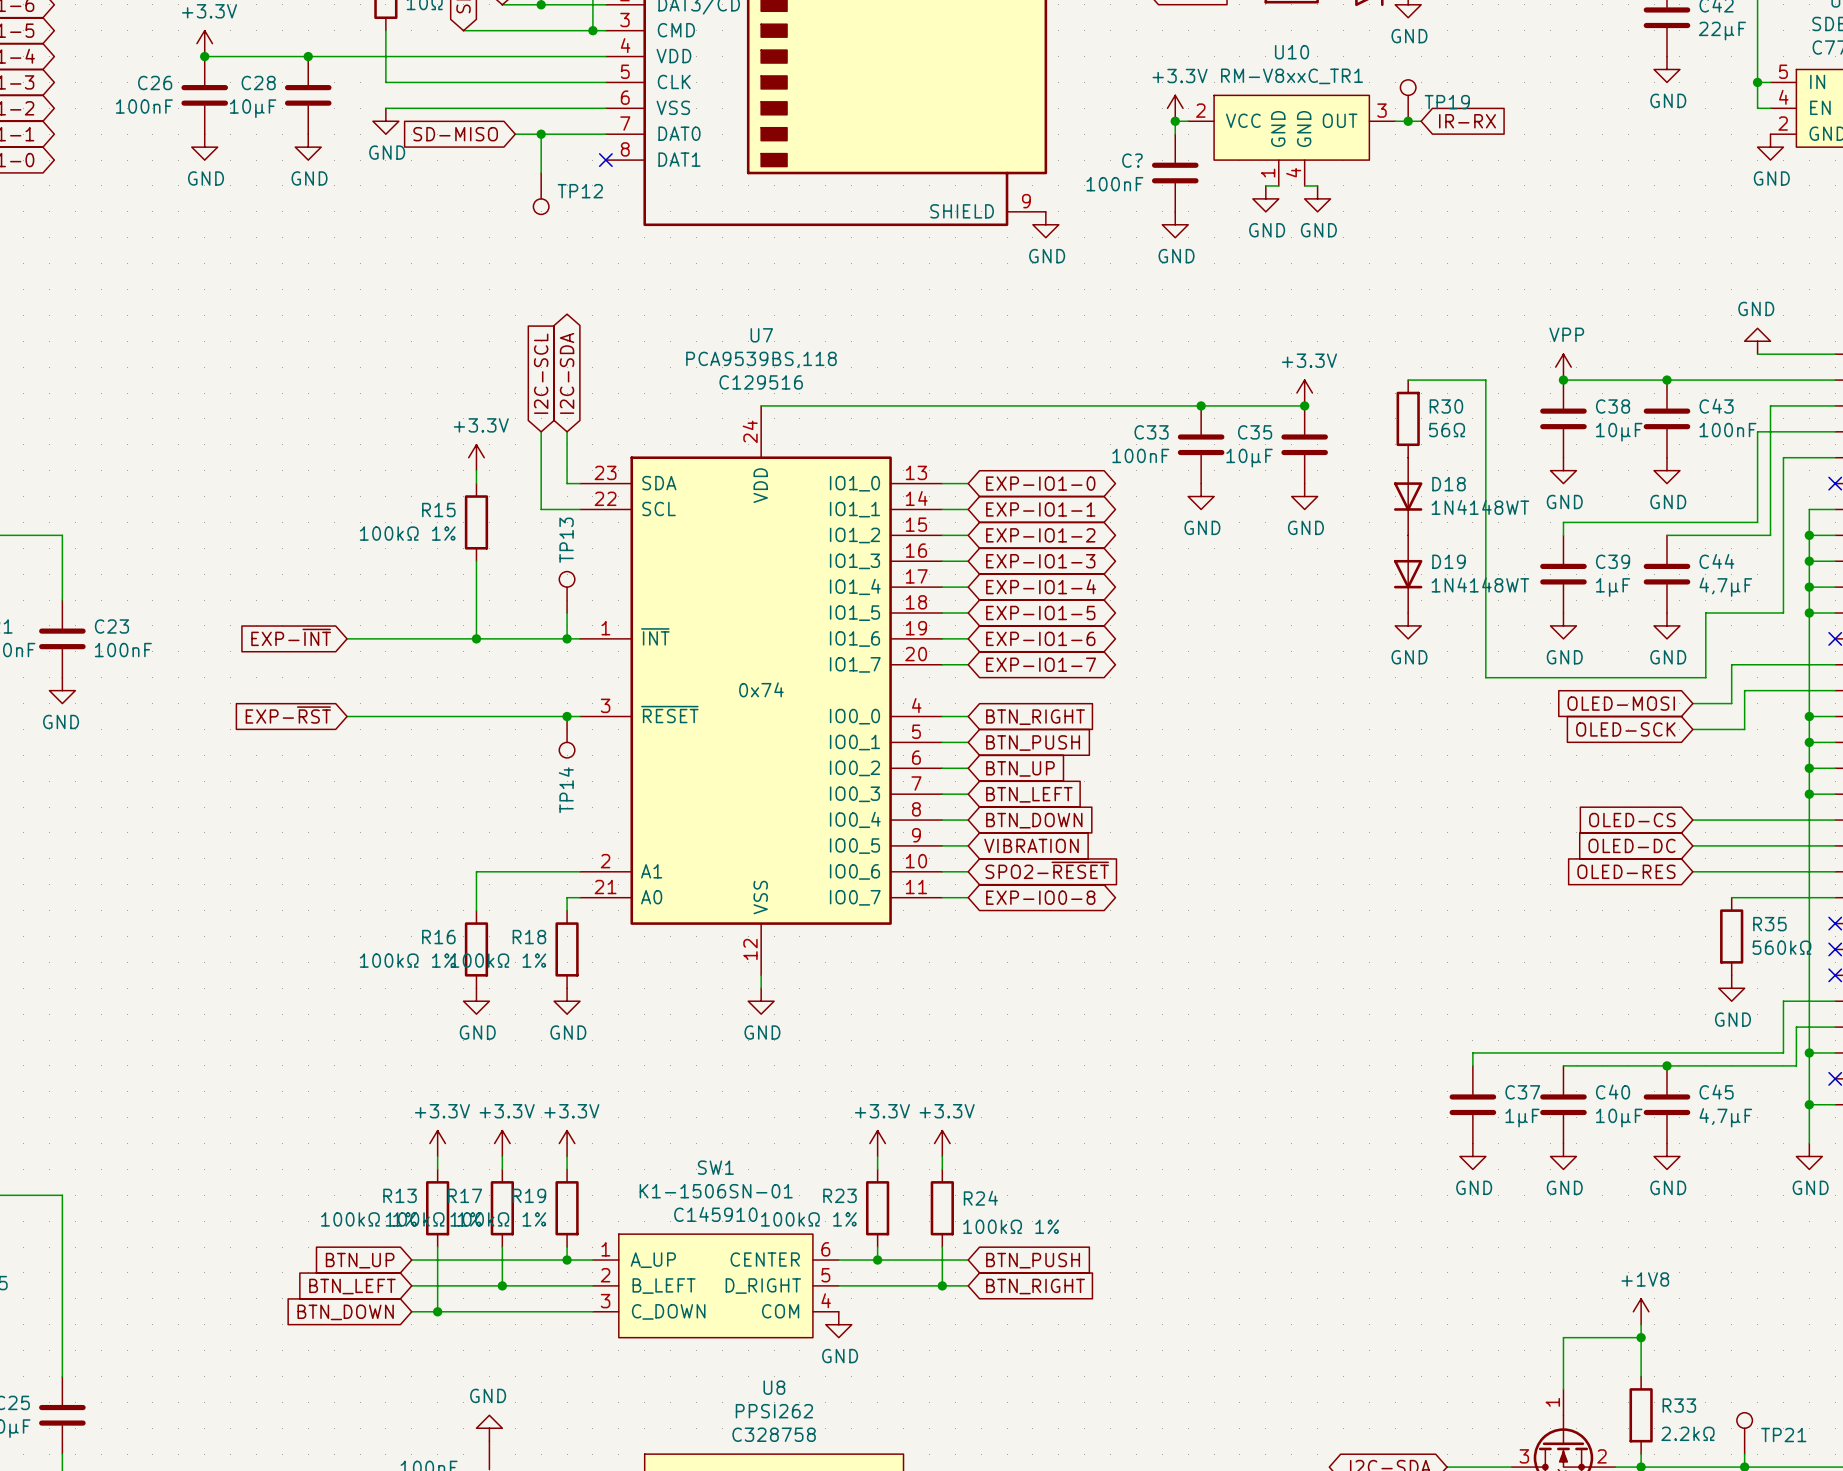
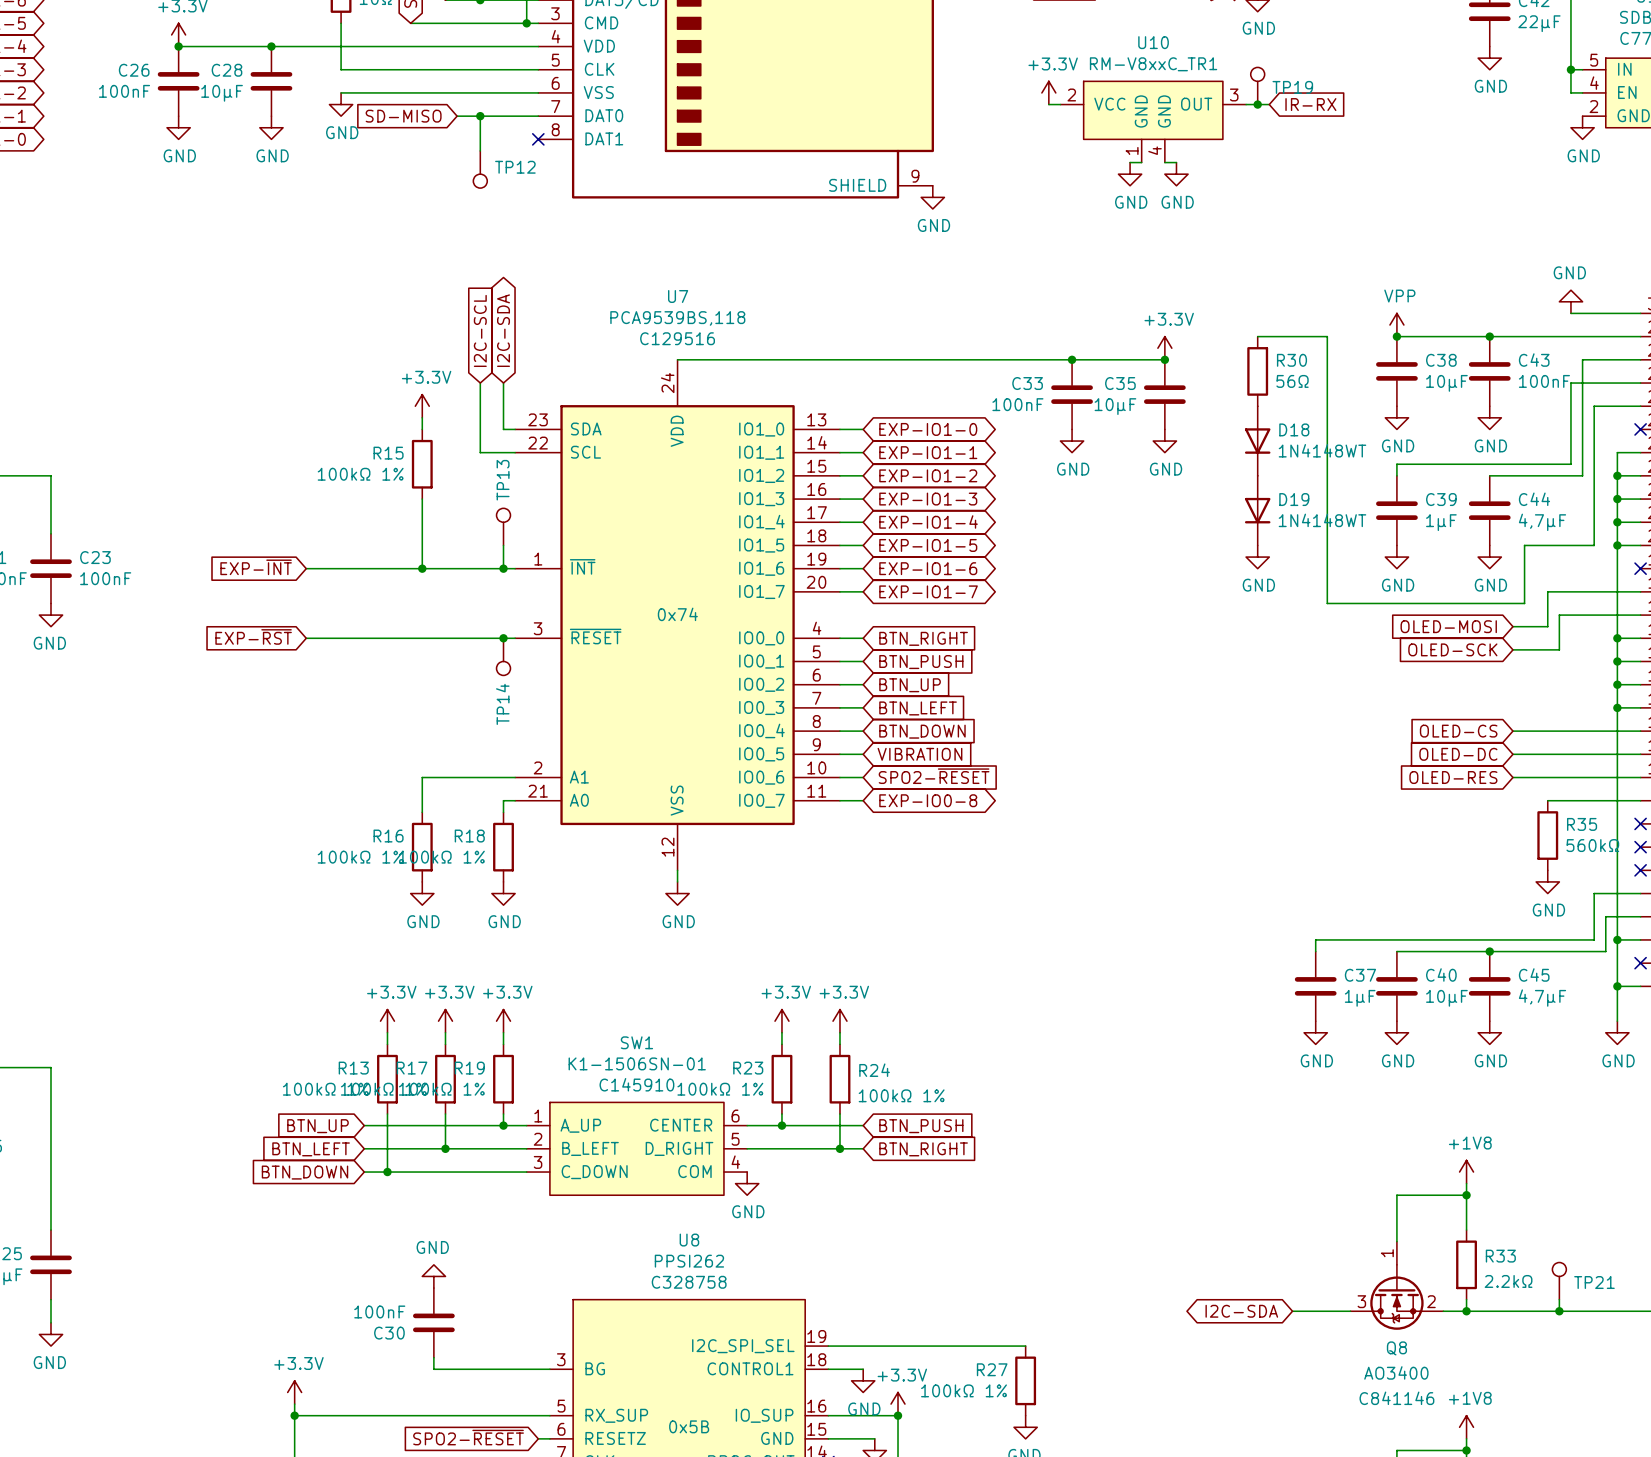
wire: (1175, 121) (1175, 134) -> none
junction: (1175, 121) -> none
C?: 100nF (1175, 173) -> none
power symbol: GND (1175, 224) -> none

